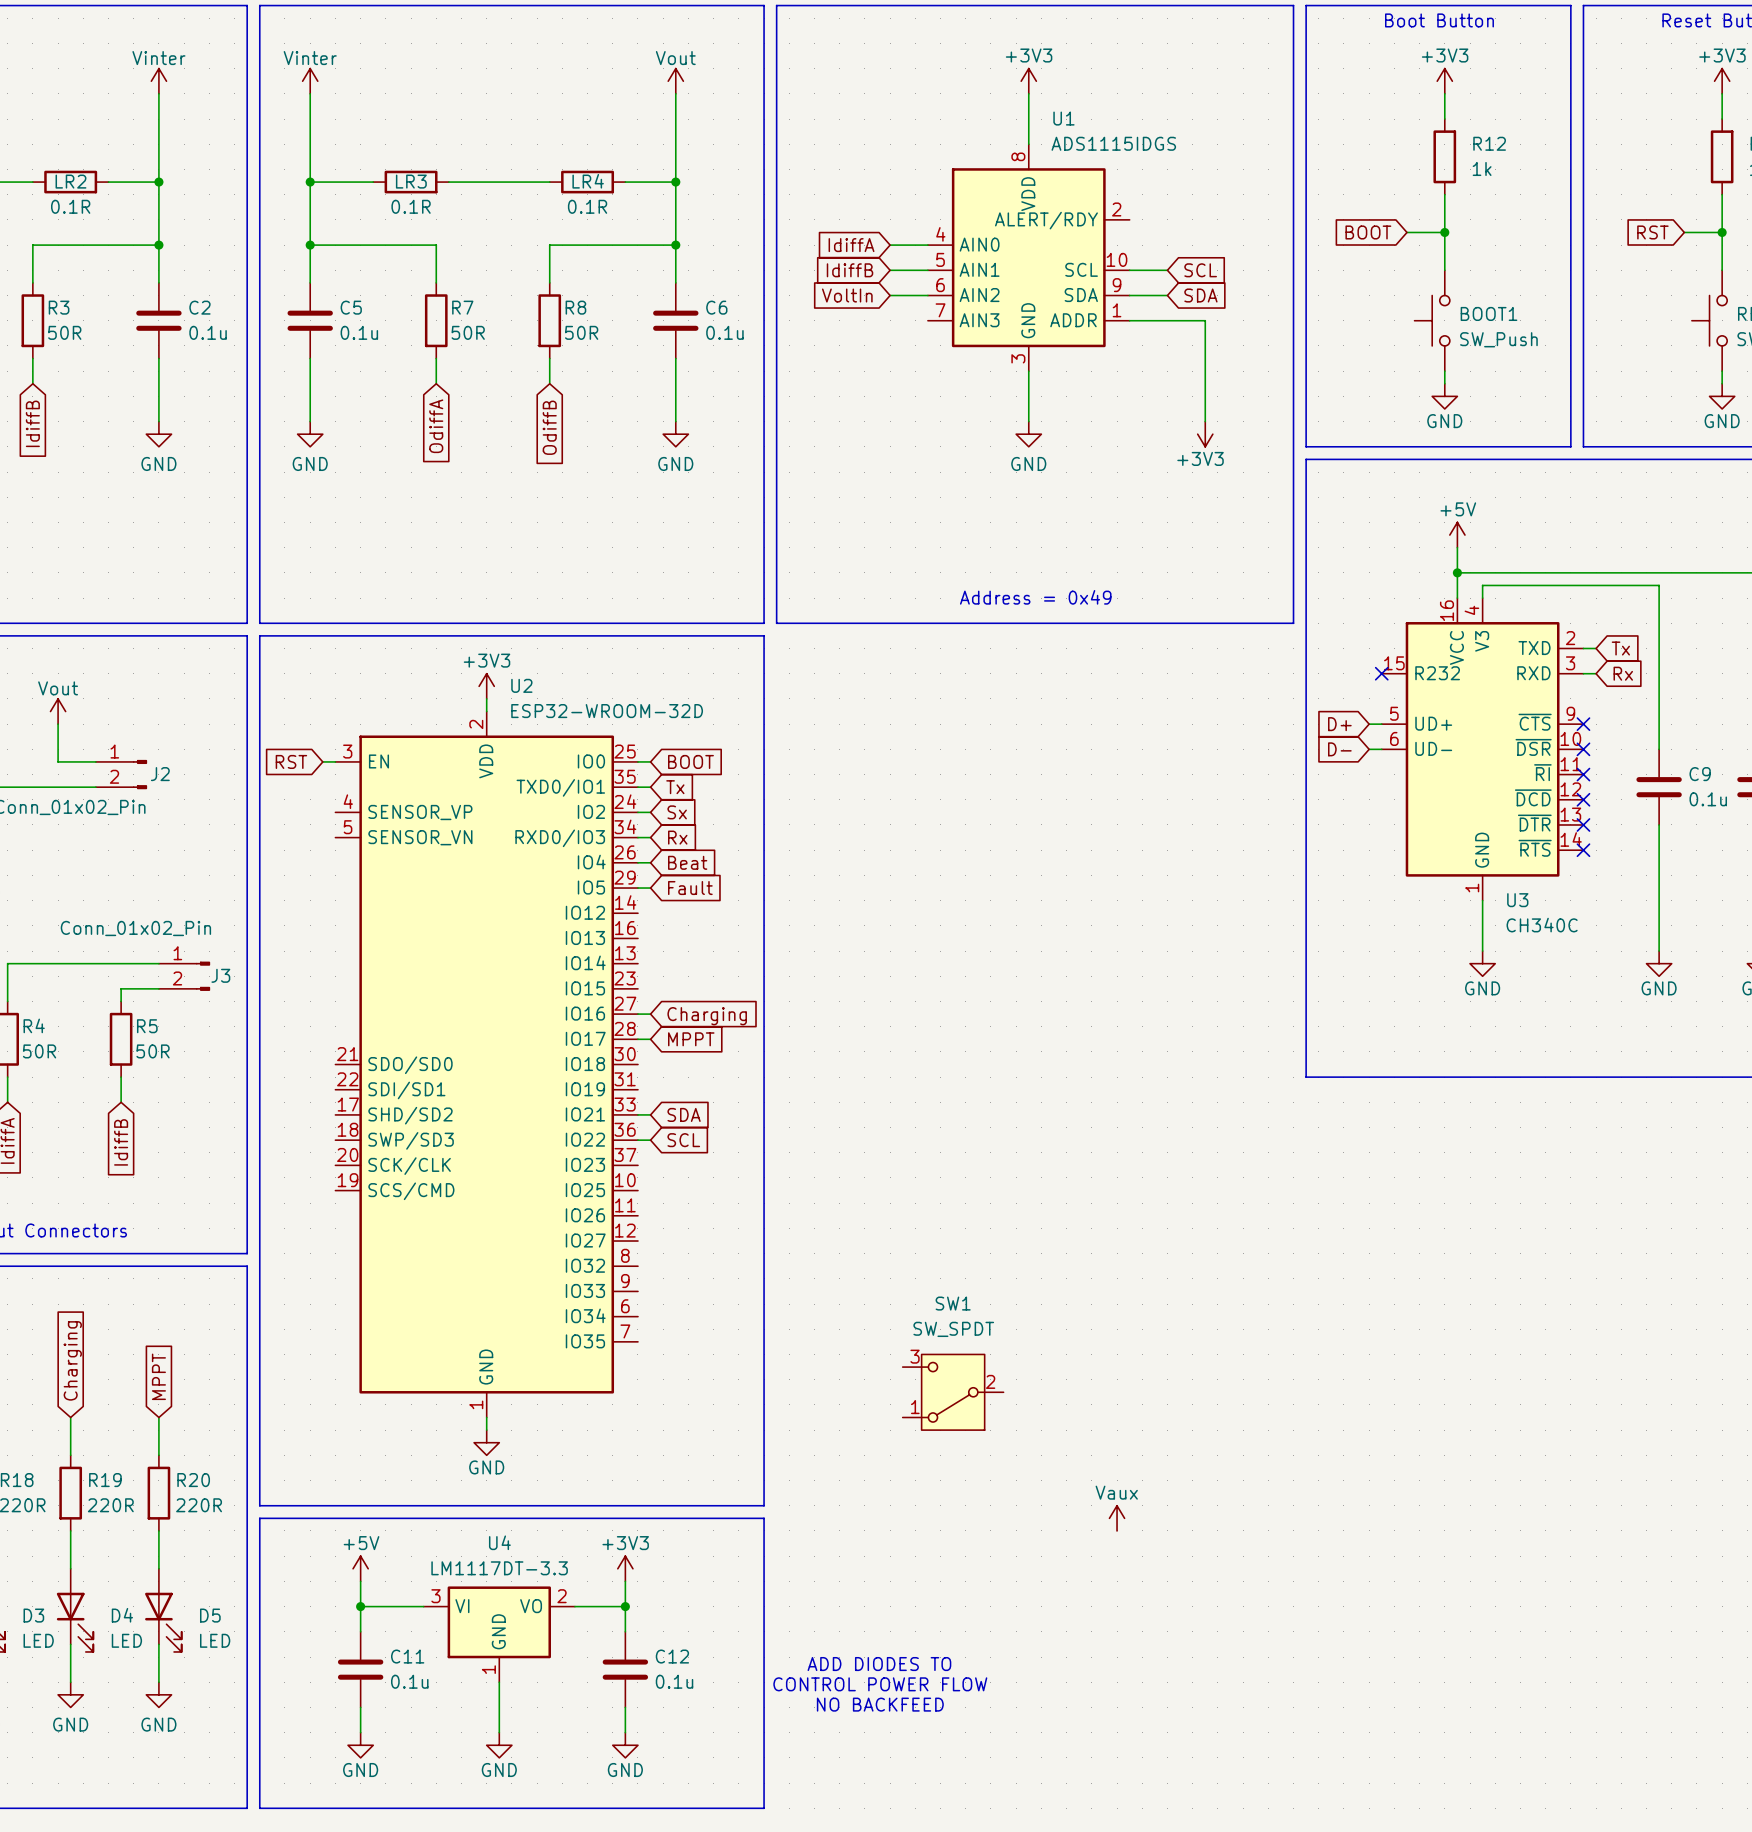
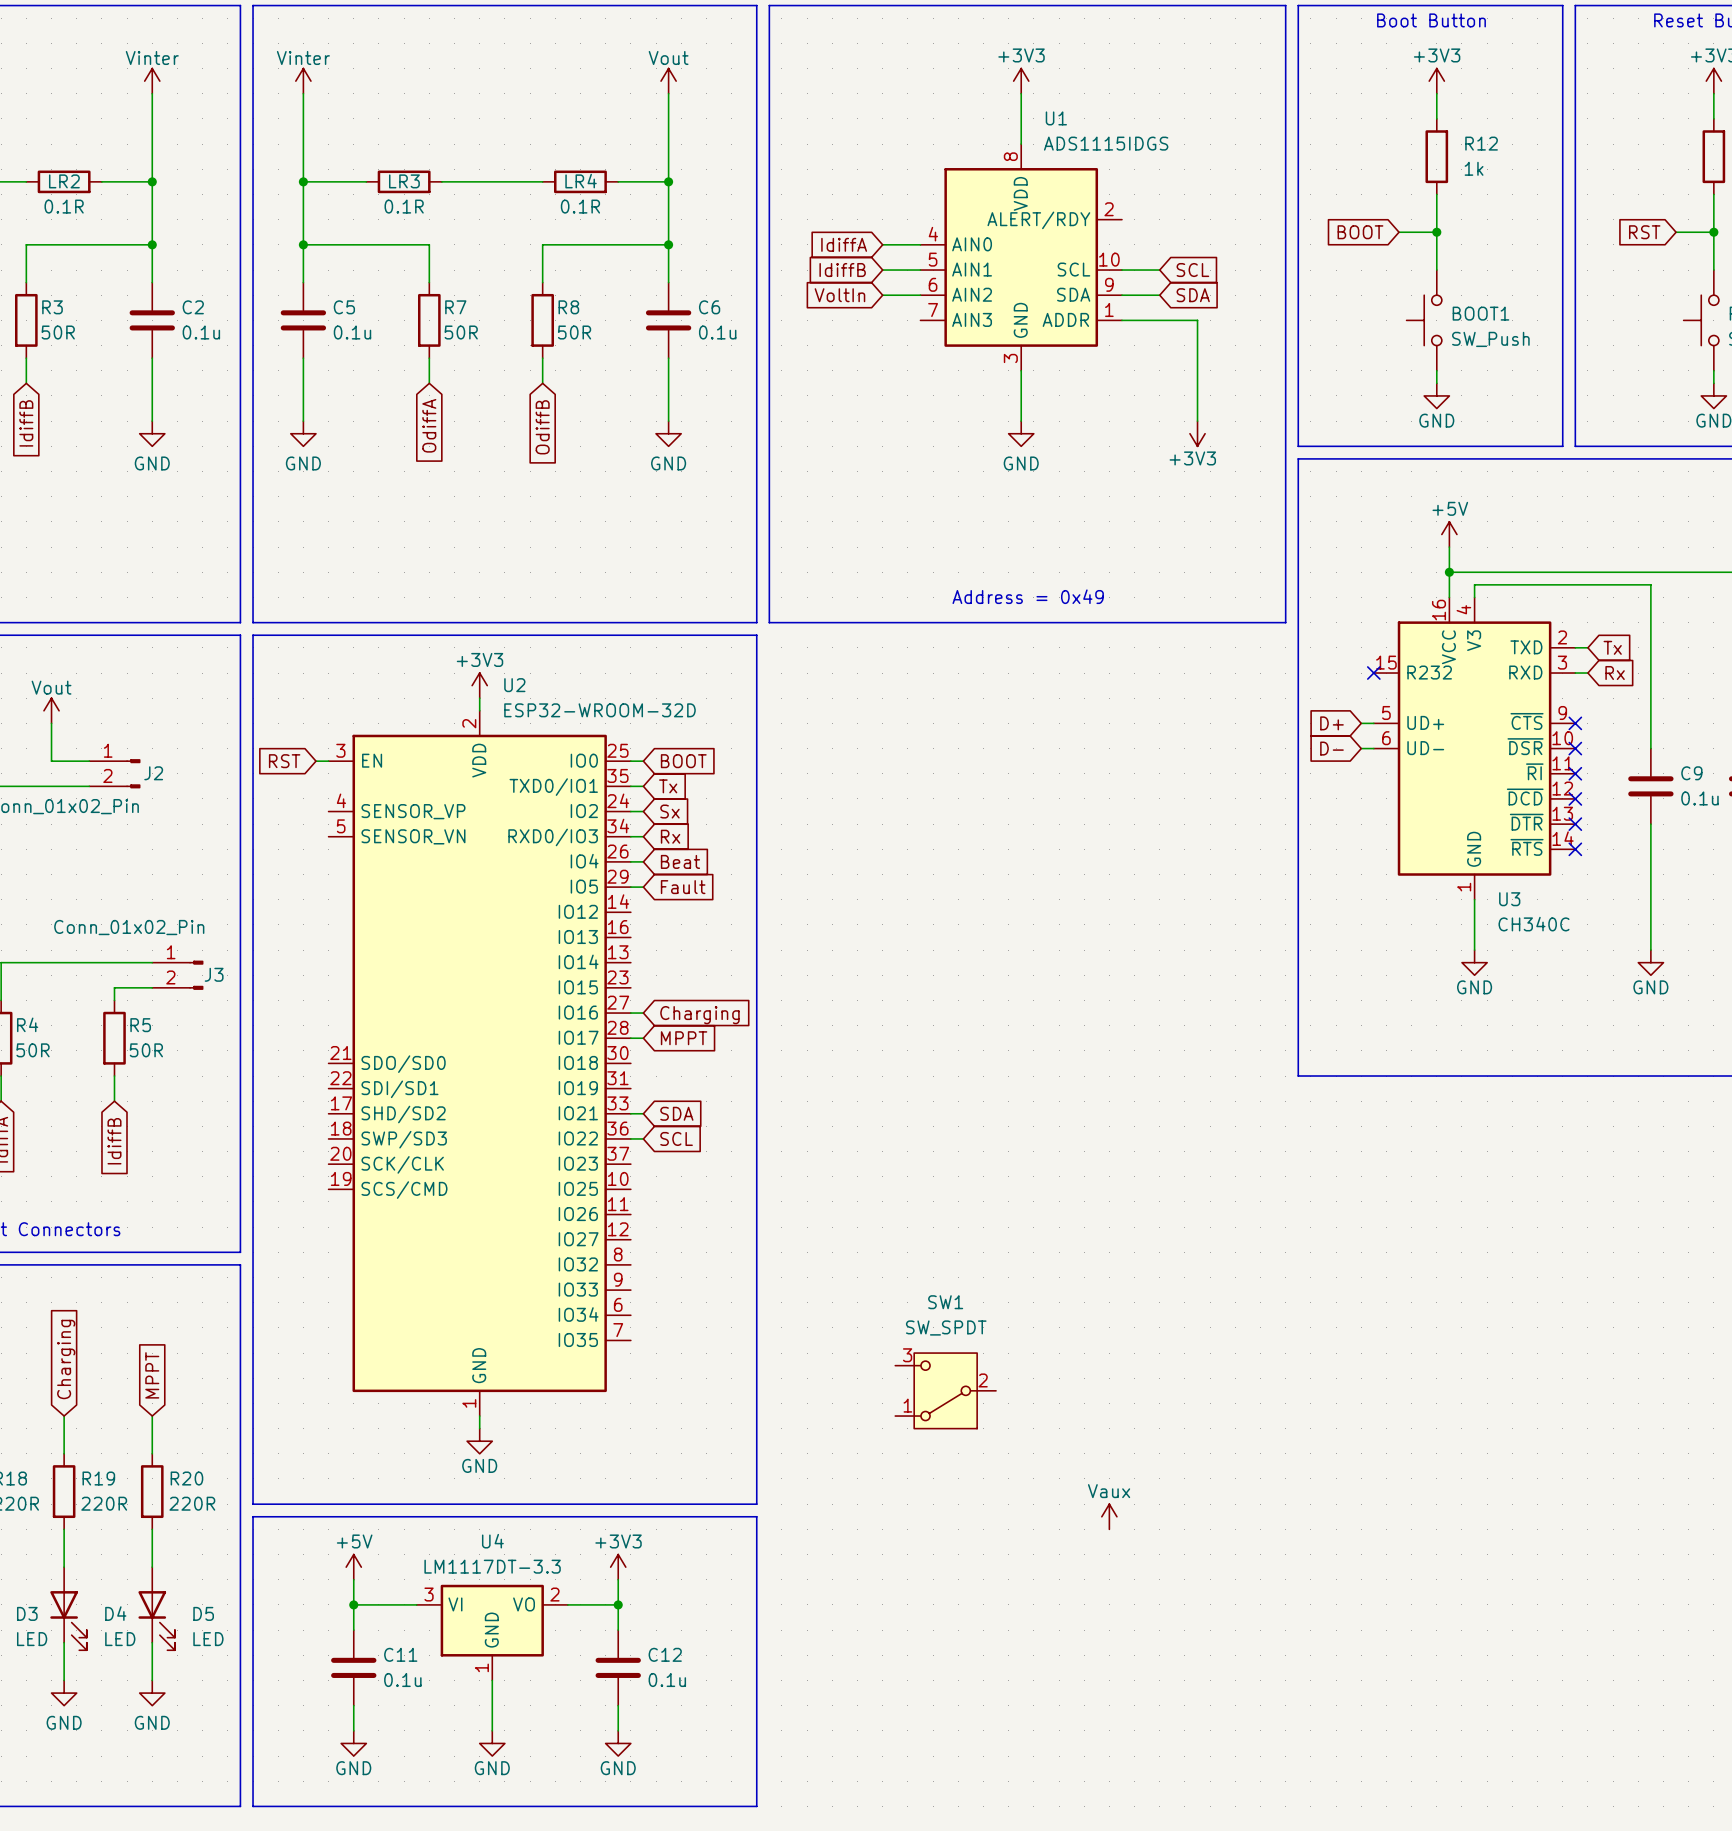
text: ADD DIODES TO (879, 1664) -> none
text: CONTROL POWER FLOW (880, 1684) -> none
text: NO BACKFEED (880, 1704) -> none

